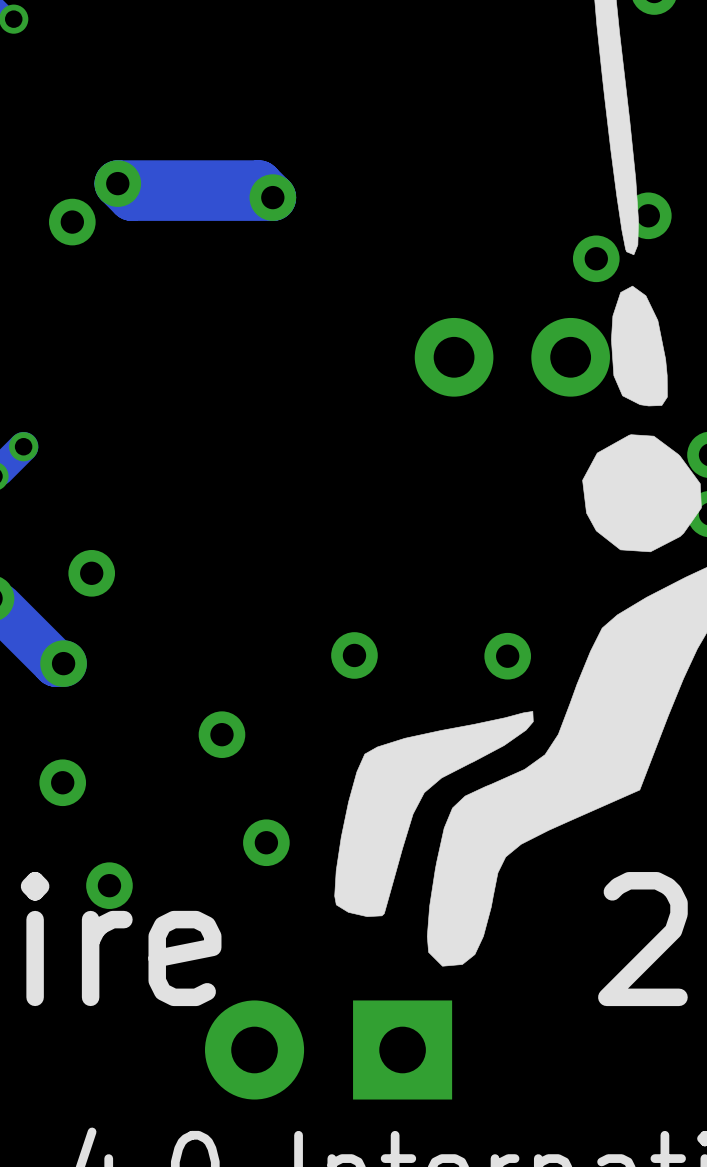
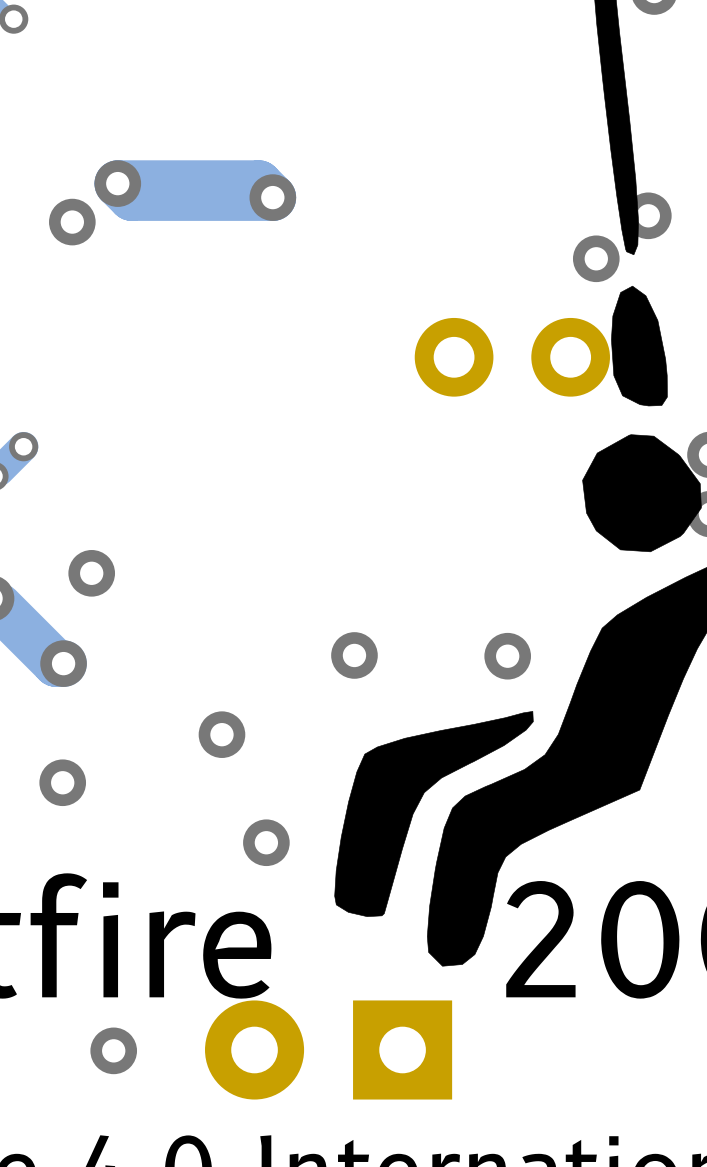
via position: (109, 885) -> (113, 1050)

